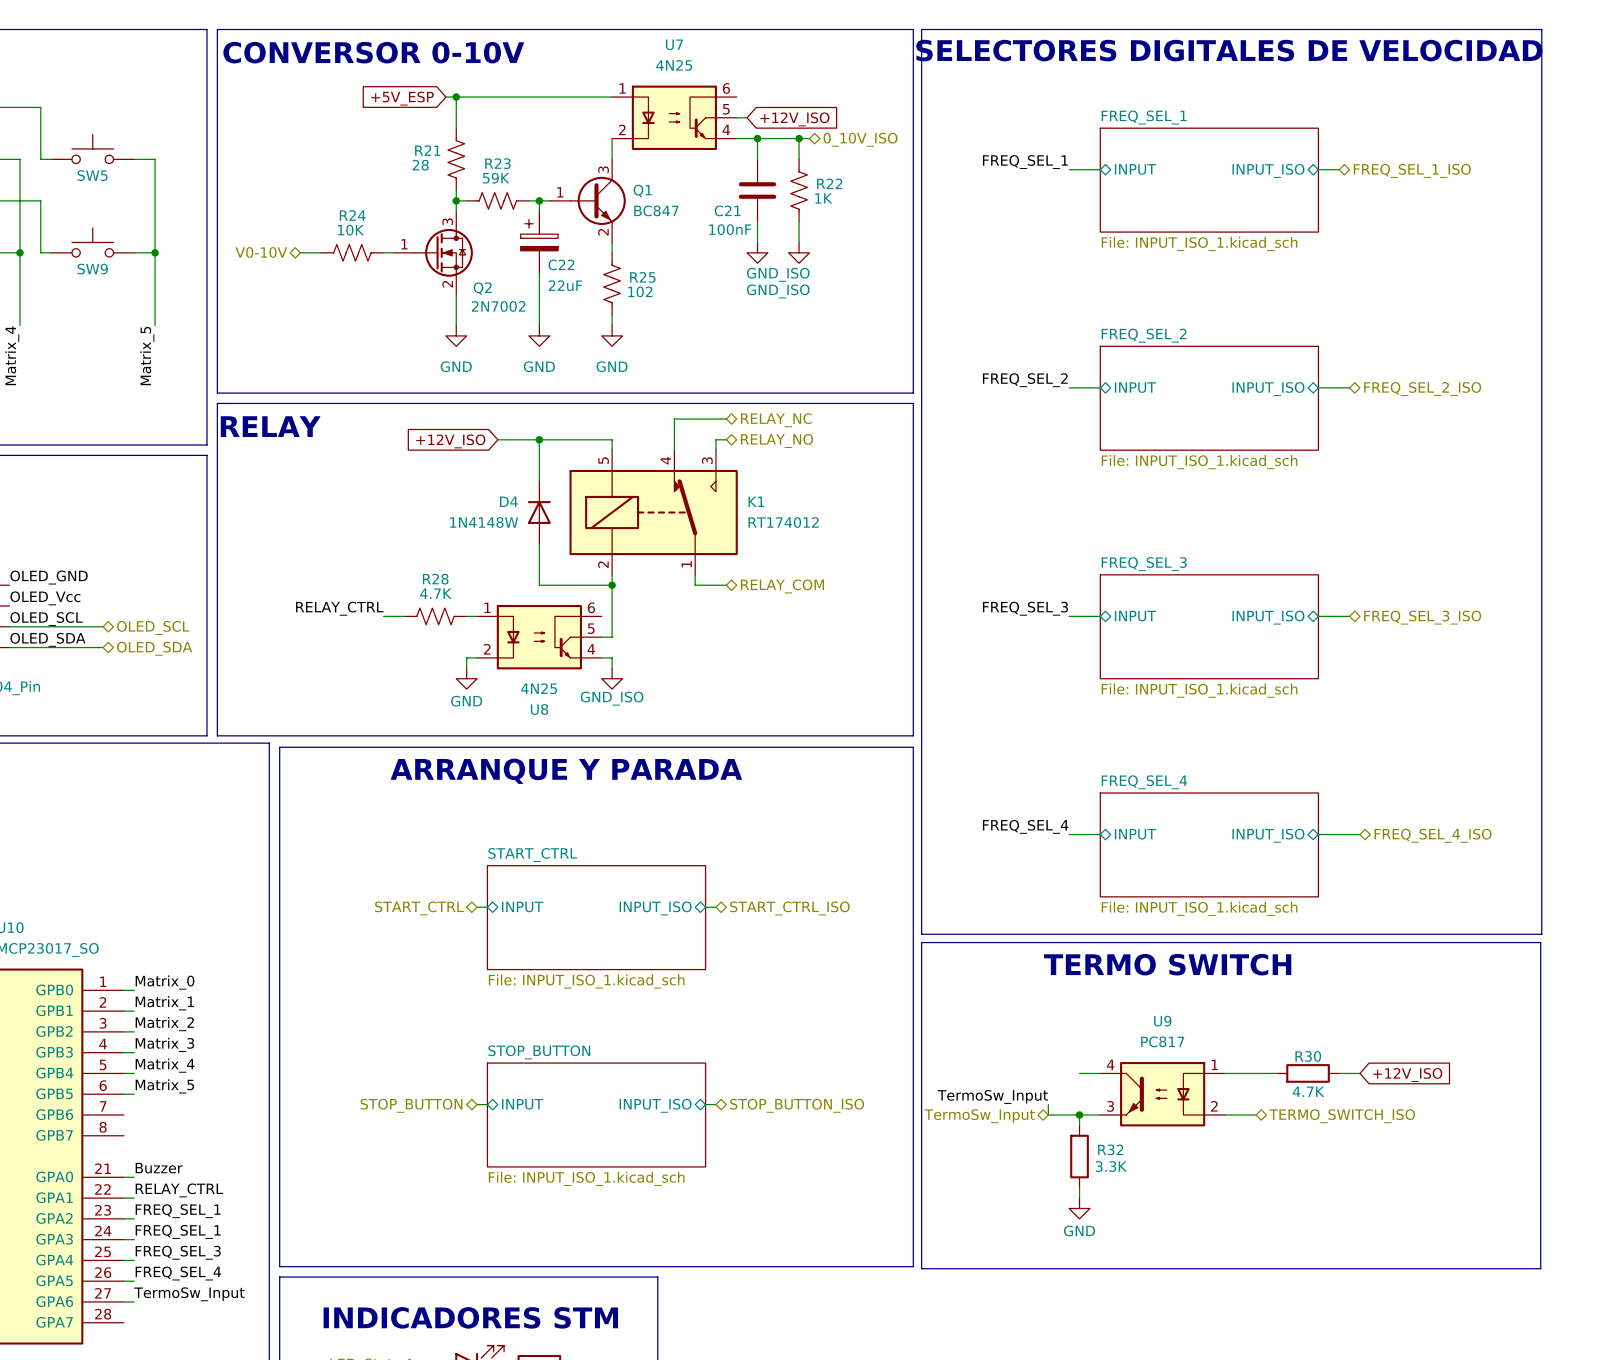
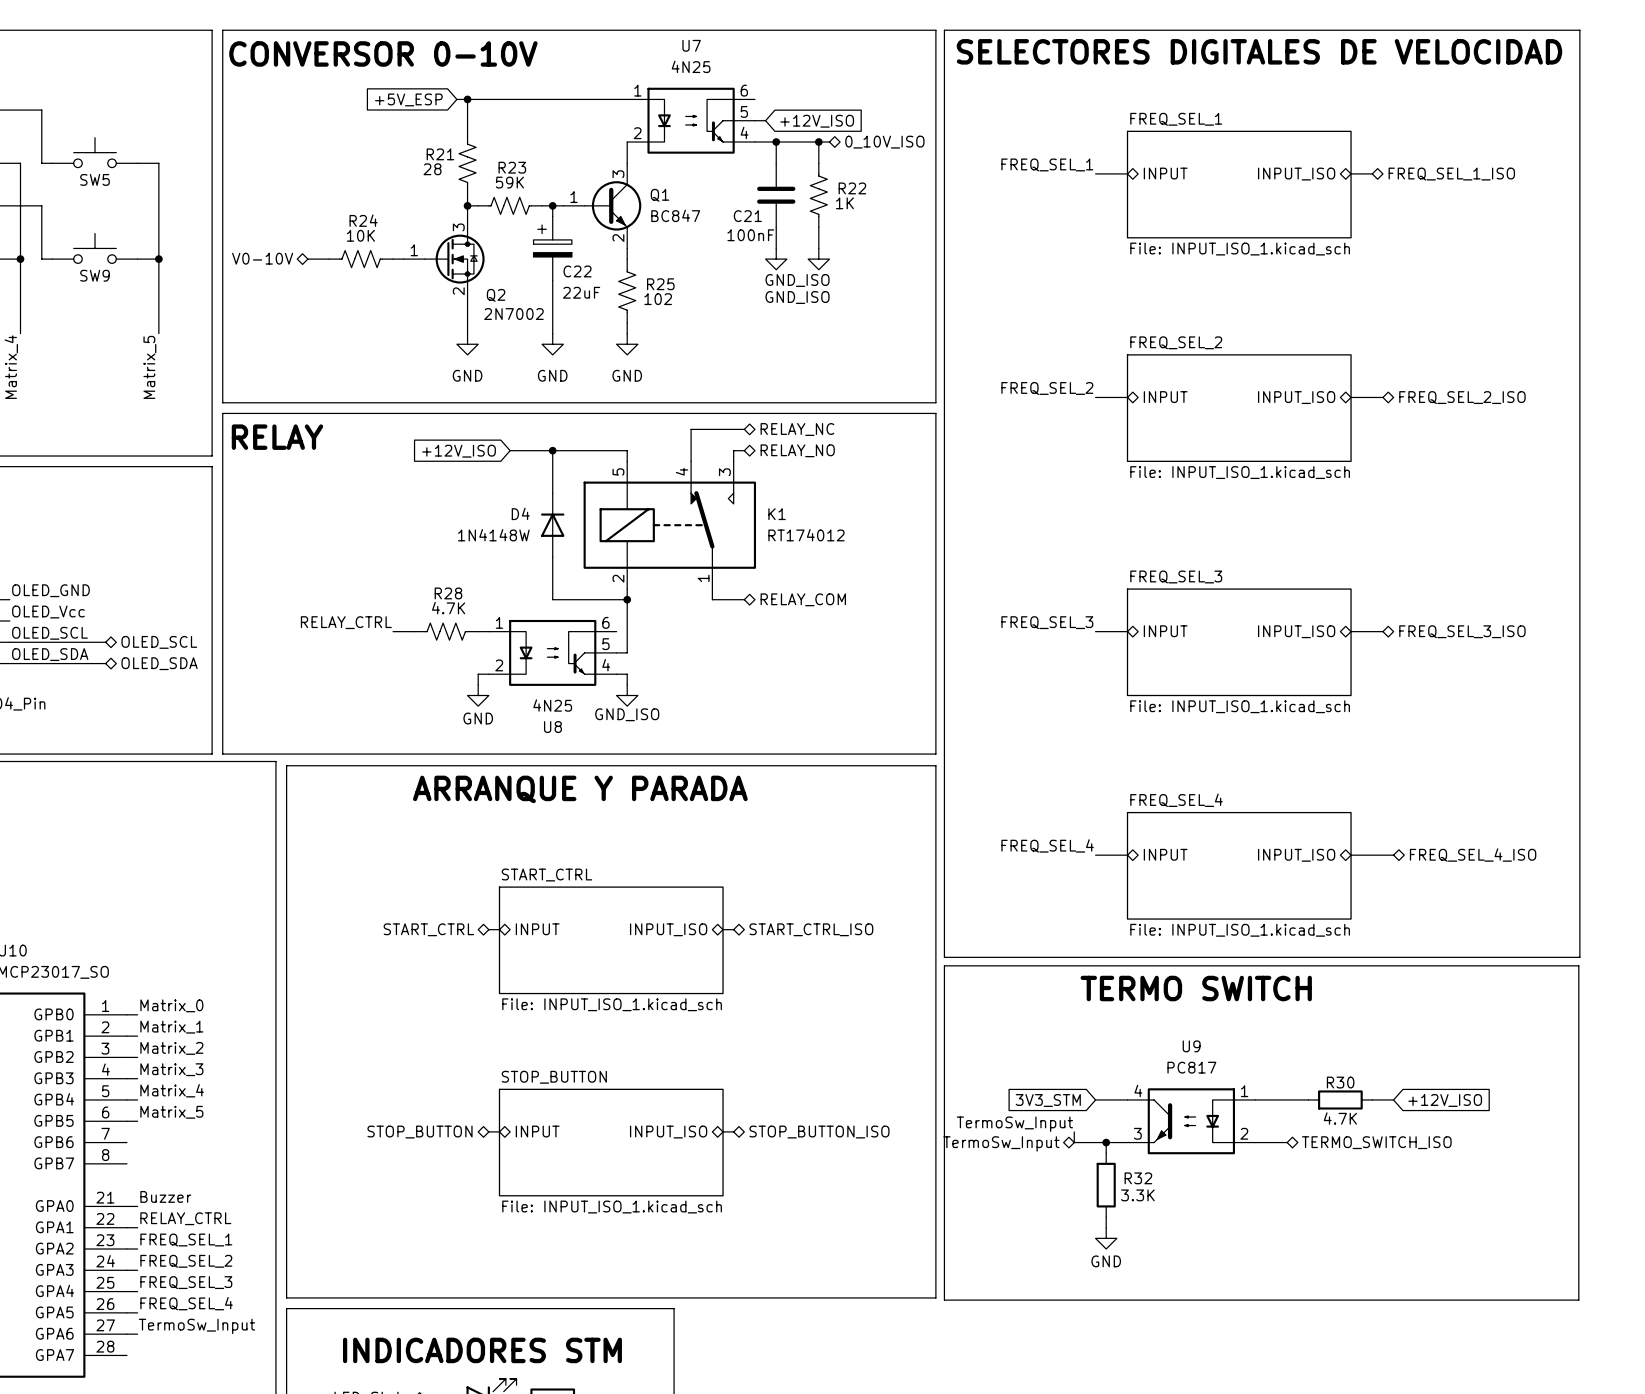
wire: none -> (1095, 1099) (1106, 1099)
global label: none -> 3V3_STM (1048, 1100)
label: FREQ_SEL_1 (178, 1231) -> FREQ_SEL_2 (186, 1261)

